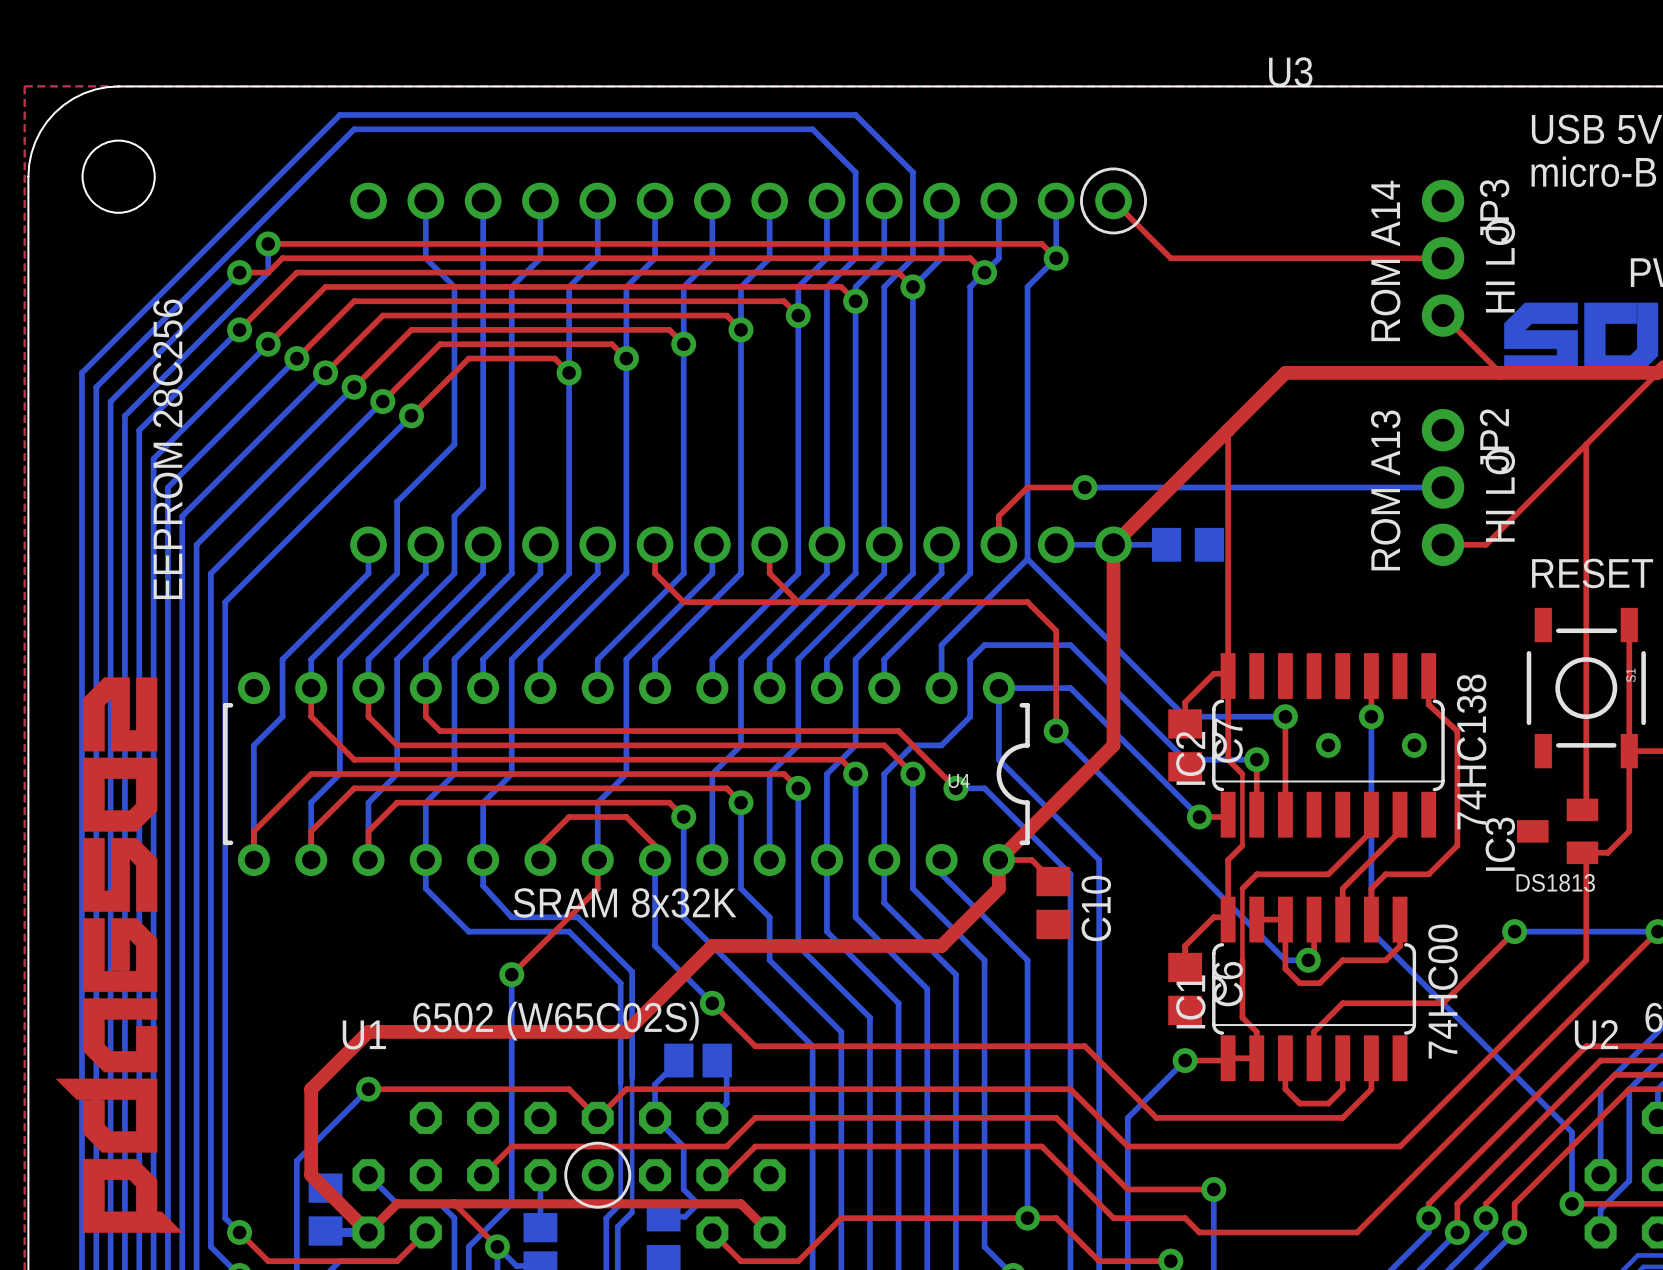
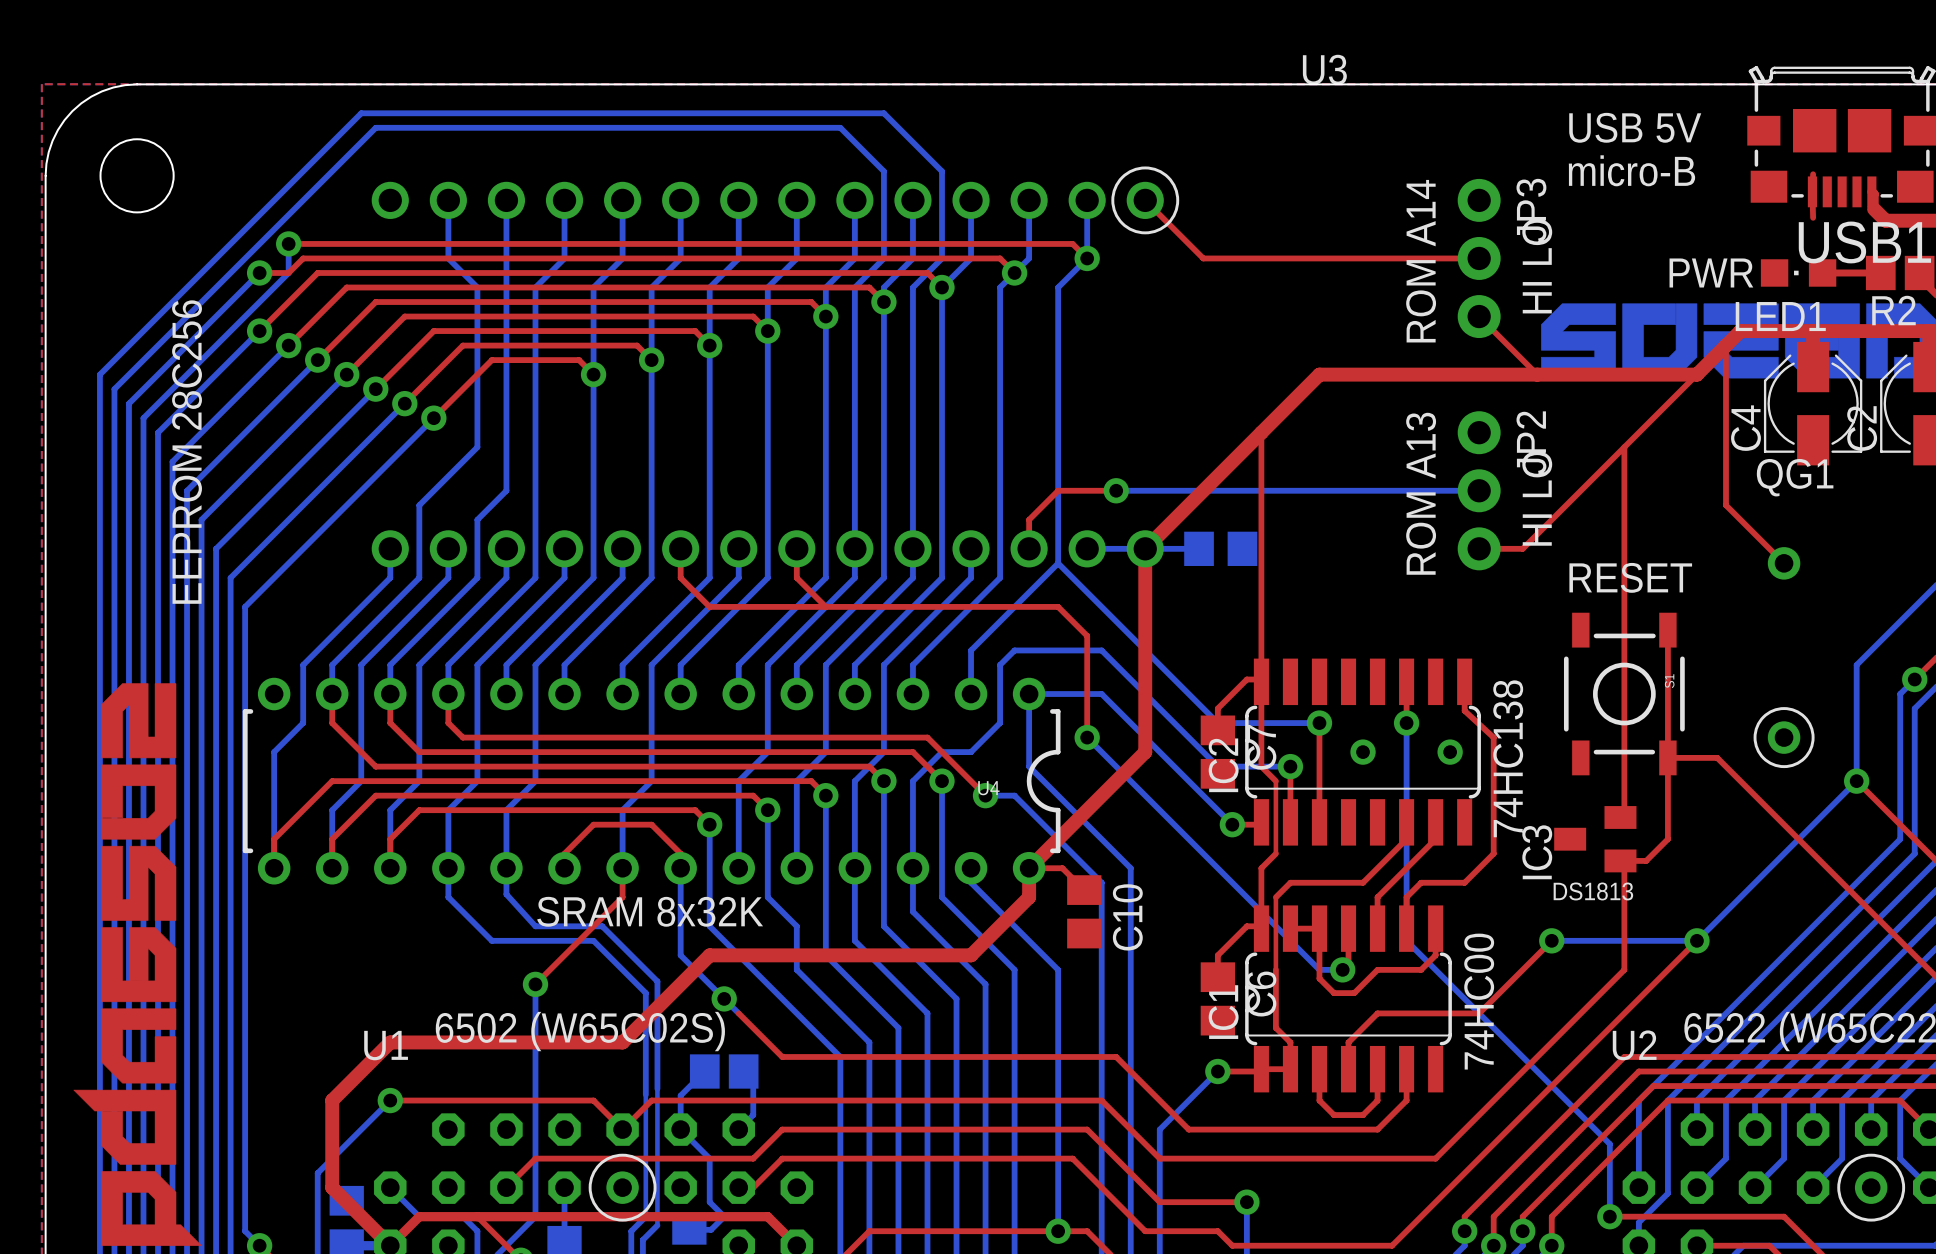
top track: (712, 945) (626, 1031) (597, 1031) -> (738, 955) (709, 955) (622, 1042)
via position: (712, 1003) -> (724, 998)

